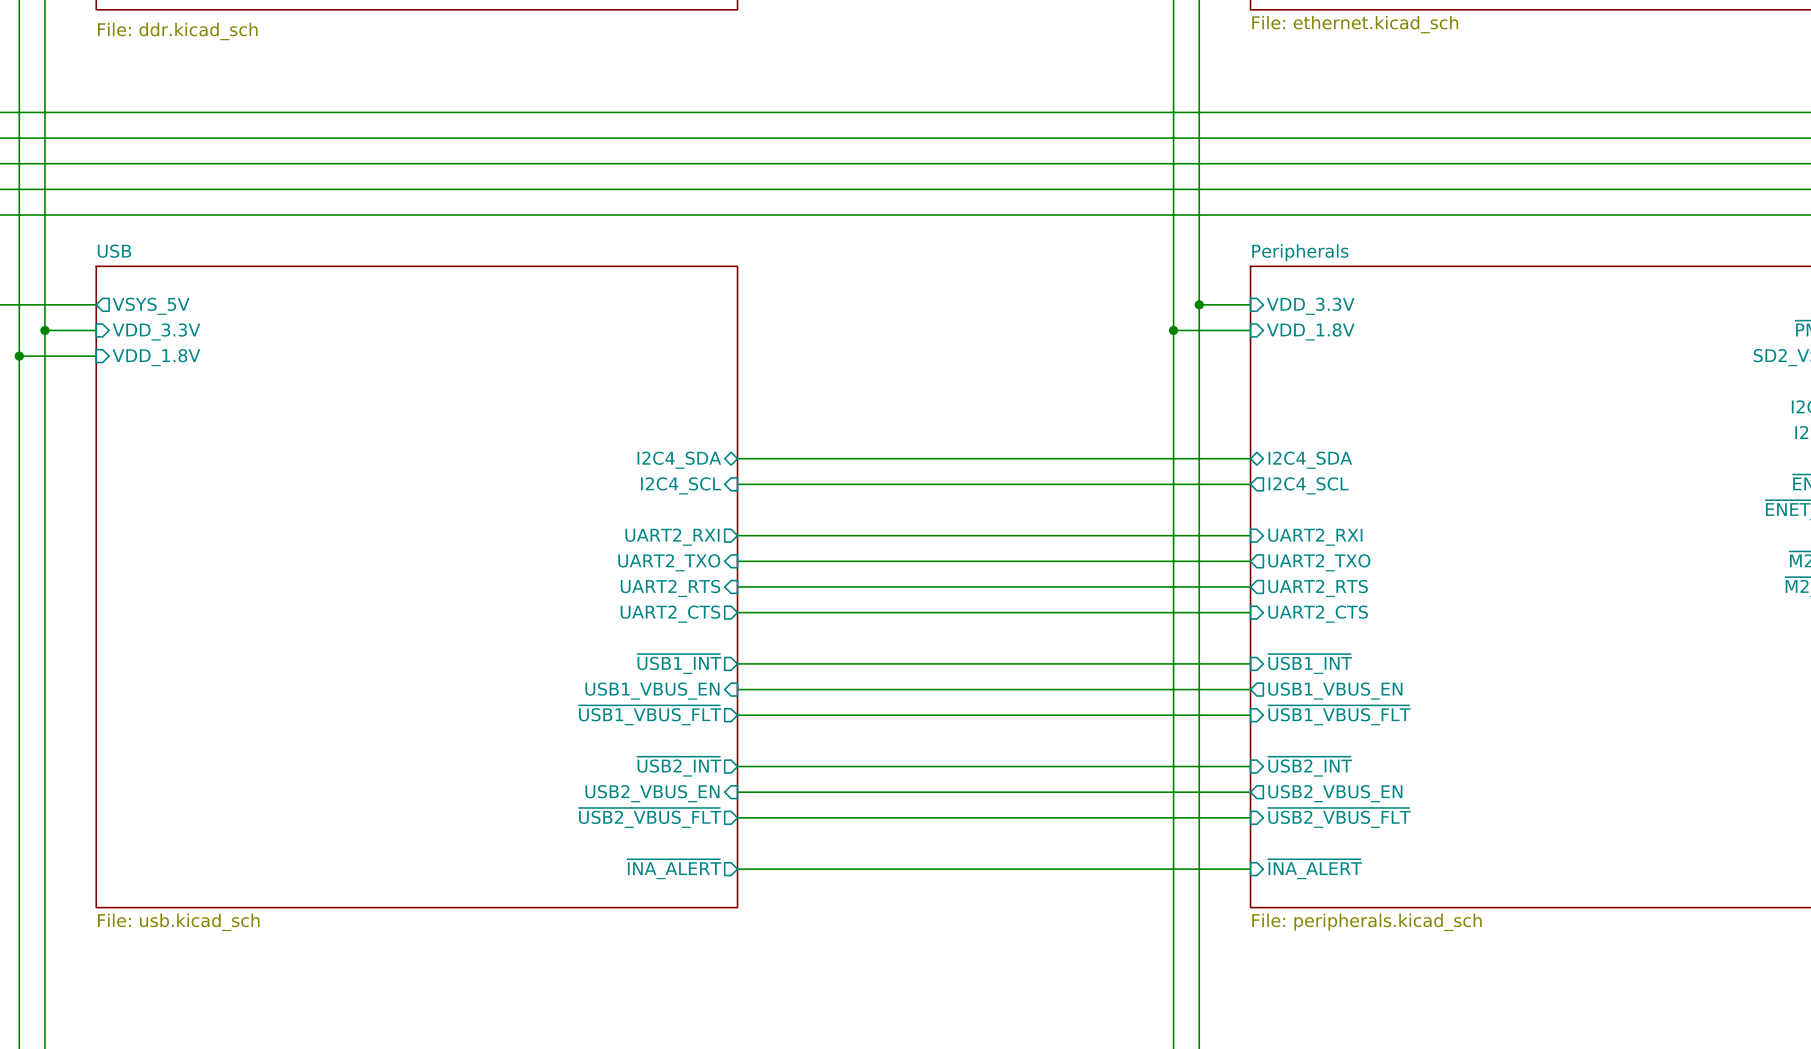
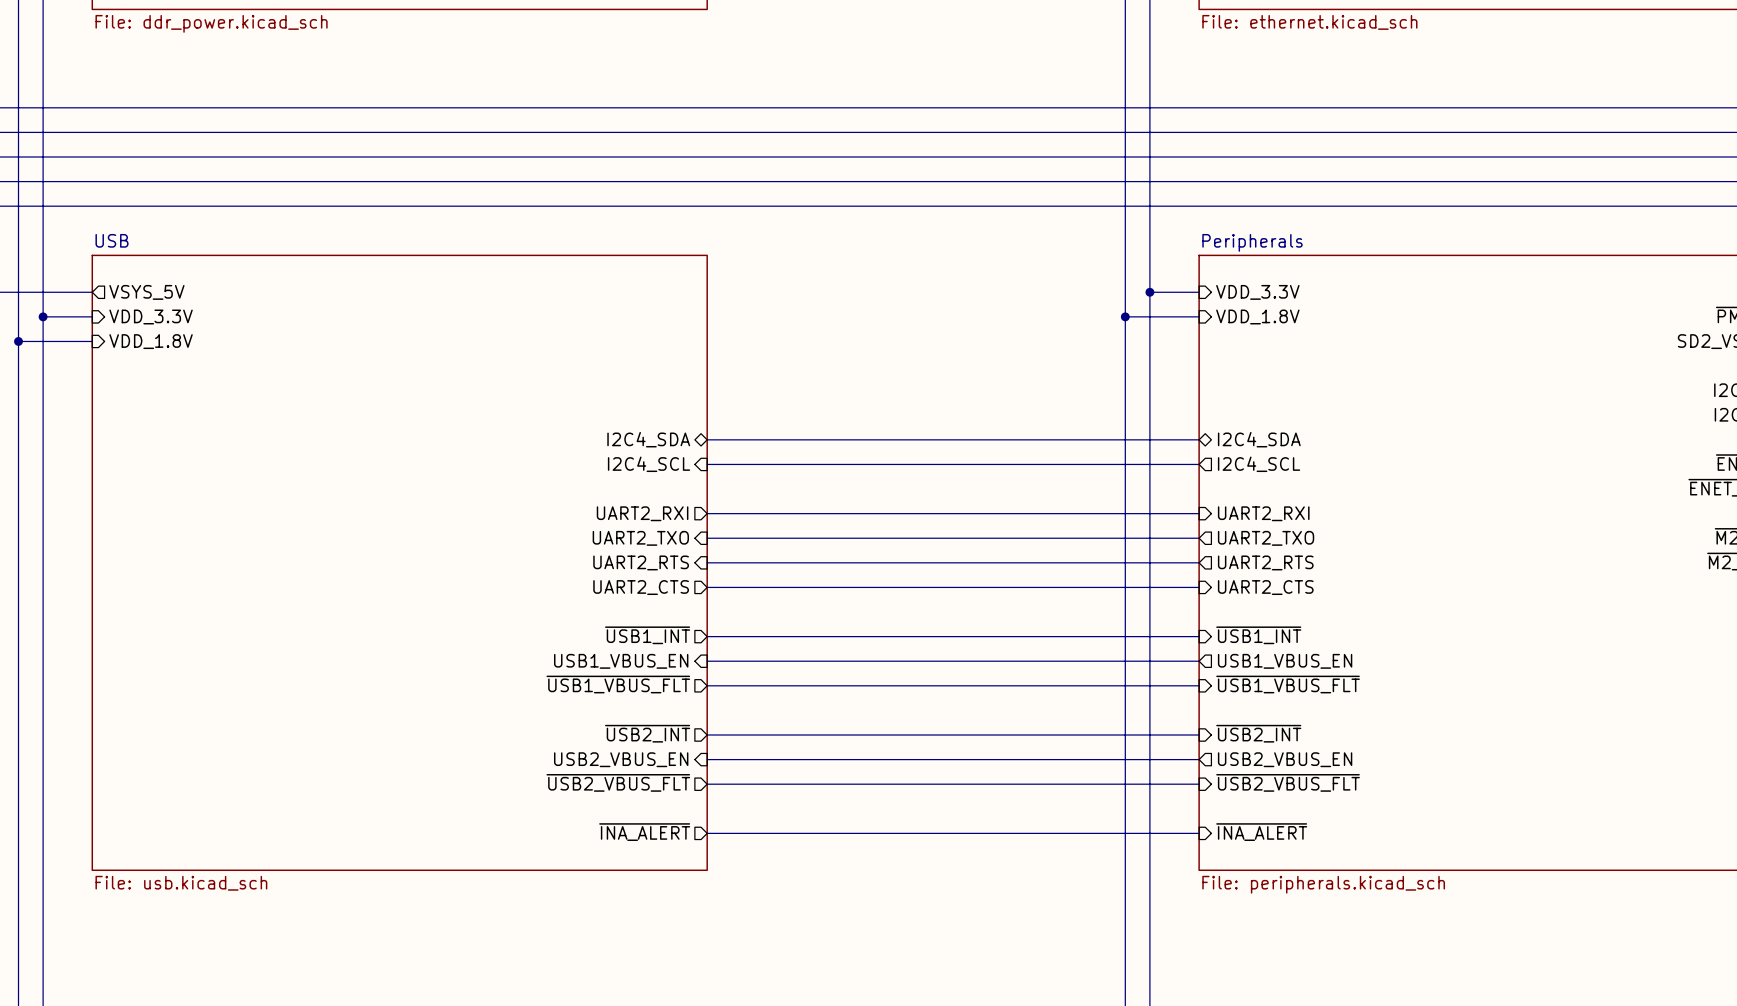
sheet value: File: ddr.kicad_sch (177, 31) -> File: ddr_power.kicad_sch (211, 23)

